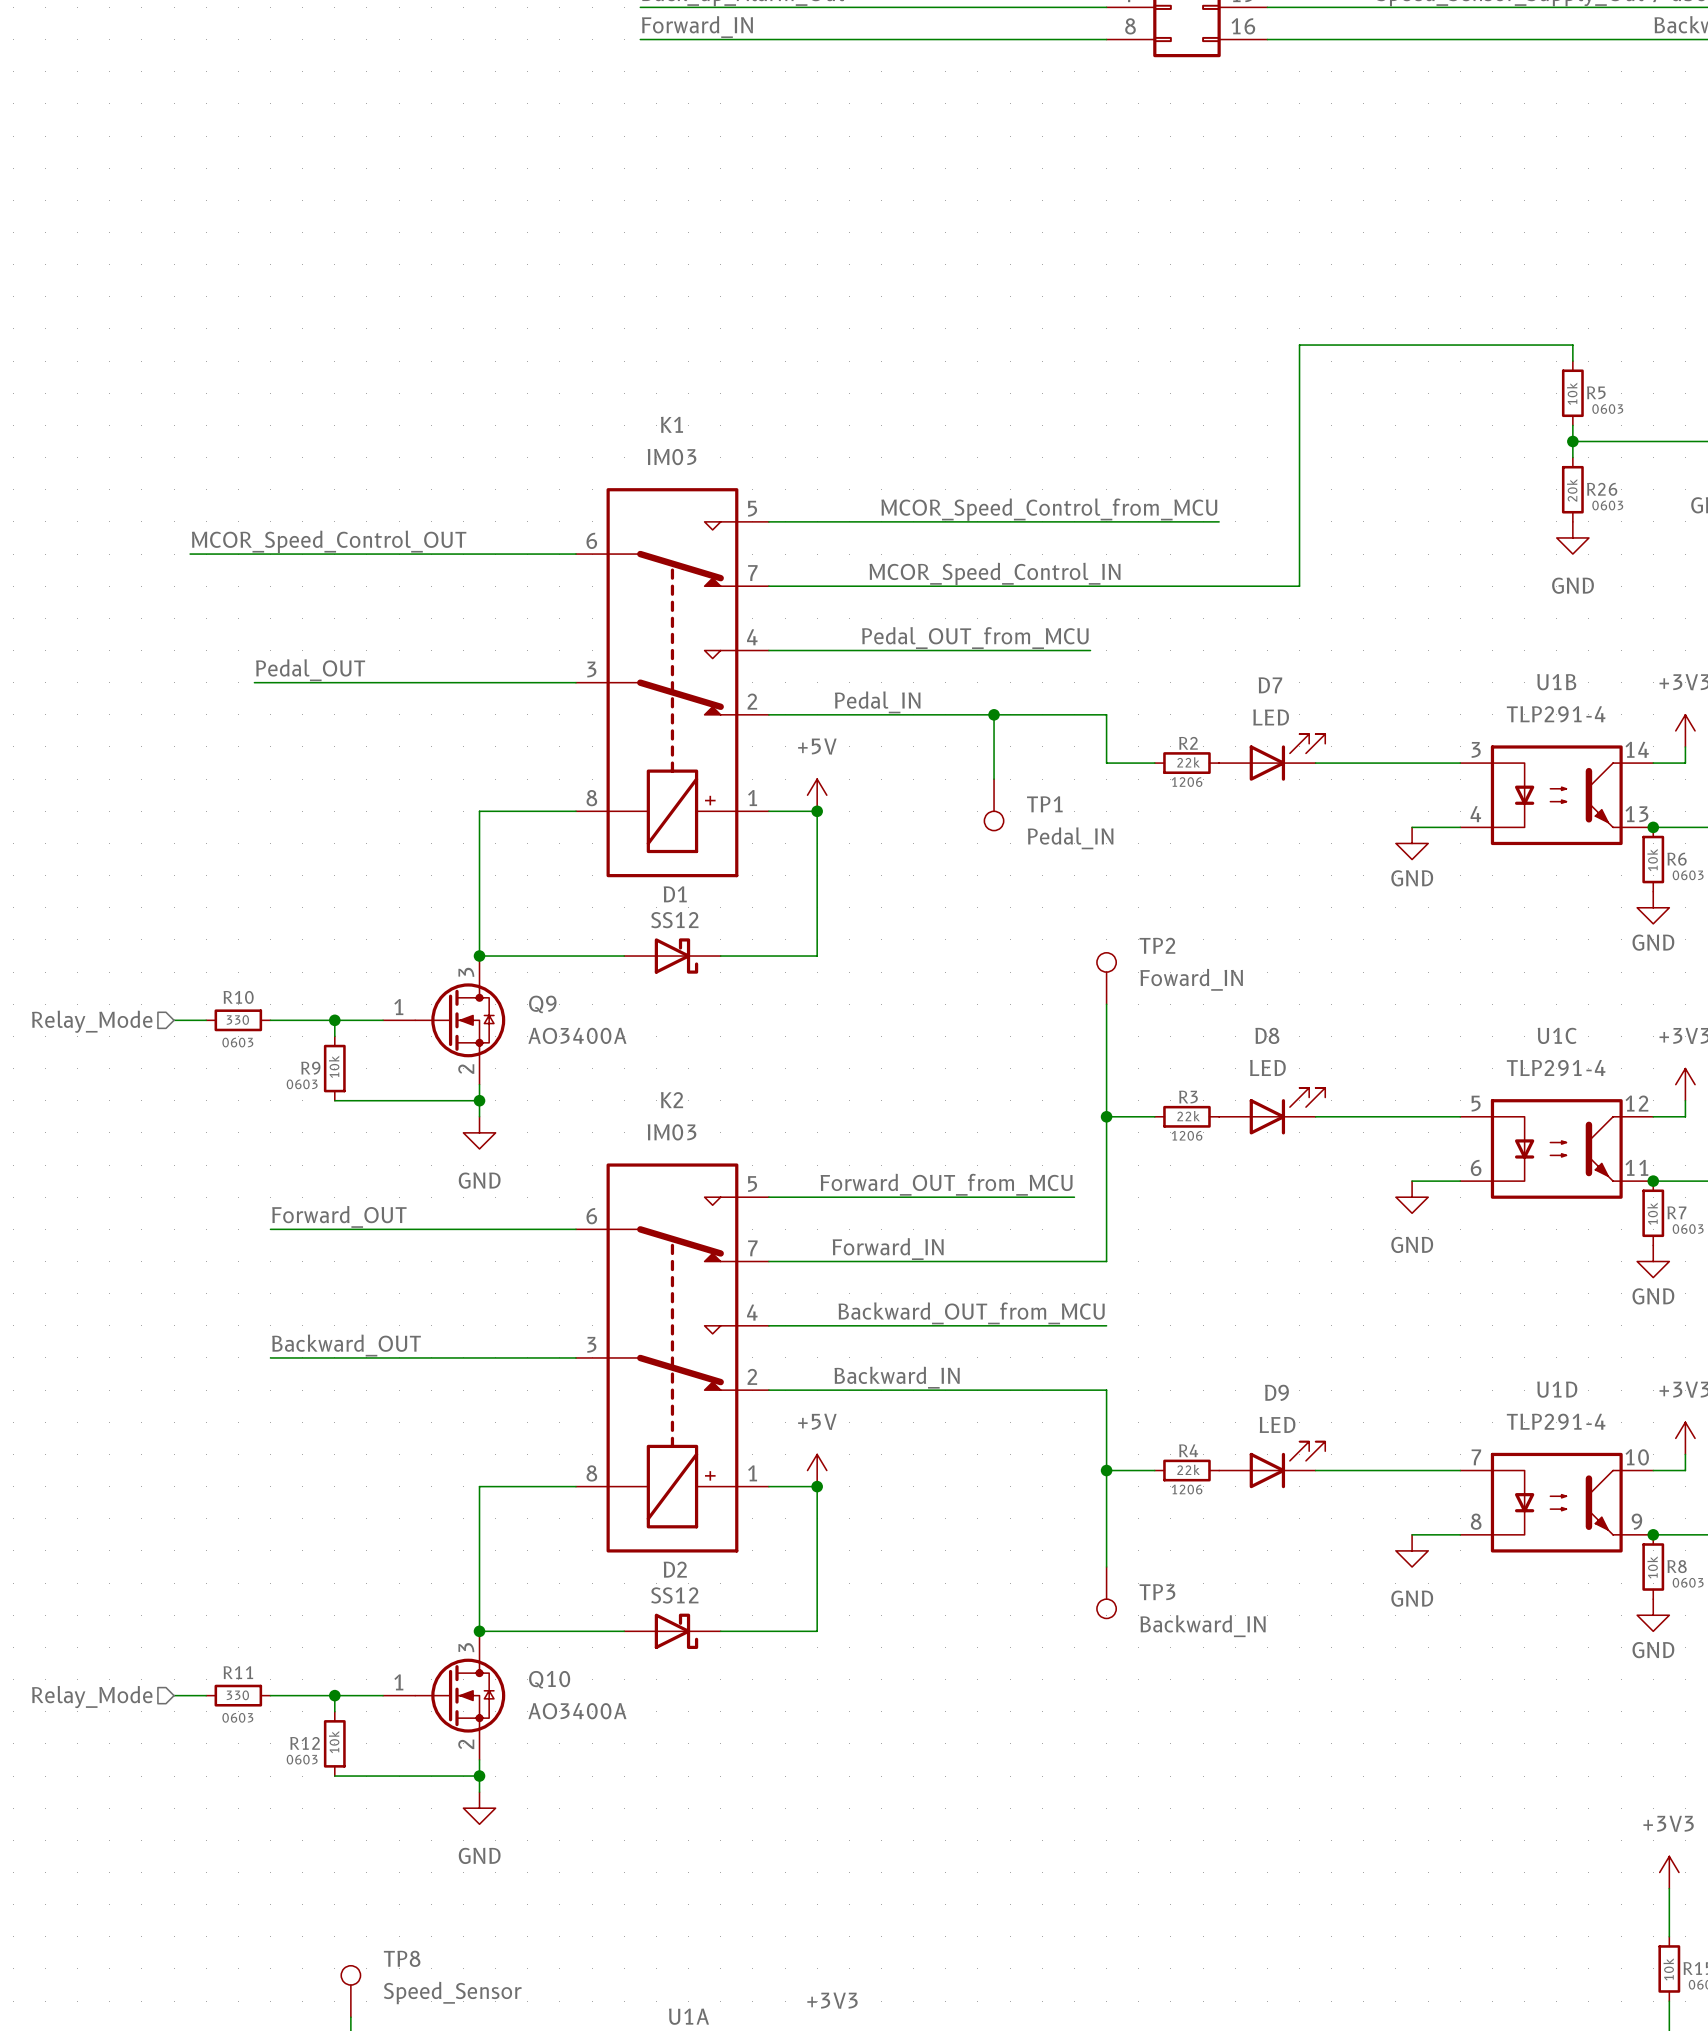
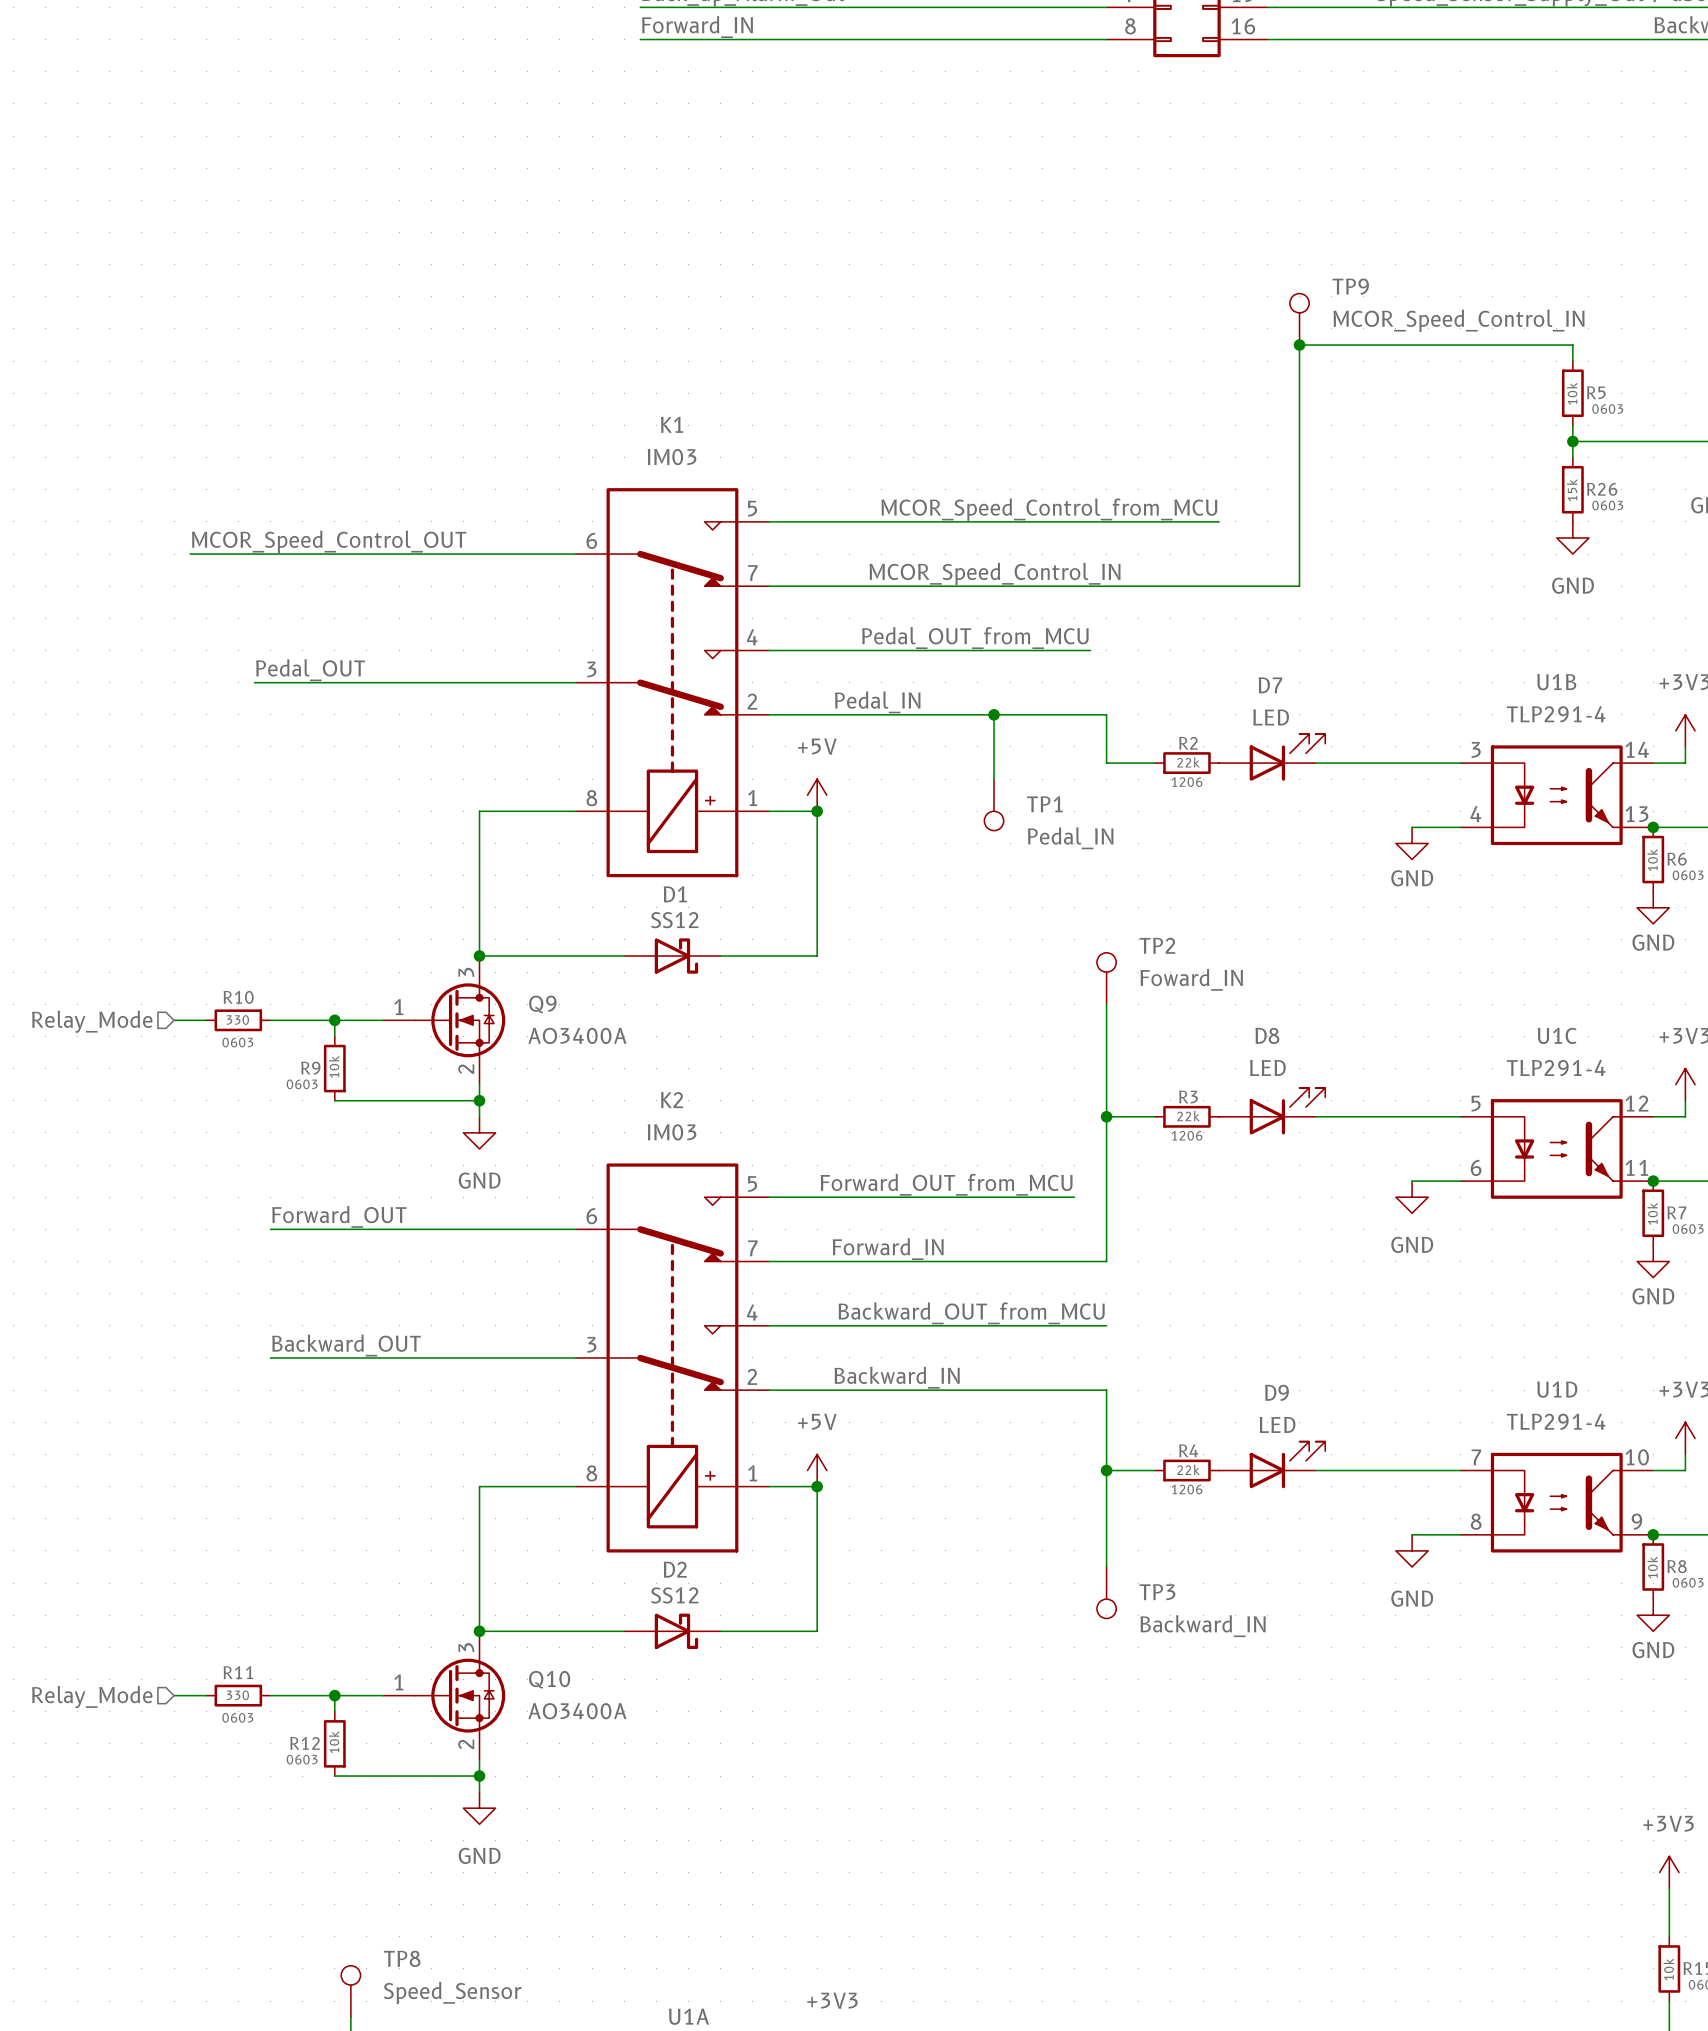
TP9: none -> MCOR_Speed_Control_IN (1299, 319)
junction: none -> (1299, 345)
R26 value: 20k (1572, 490) -> 15k (1572, 490)

